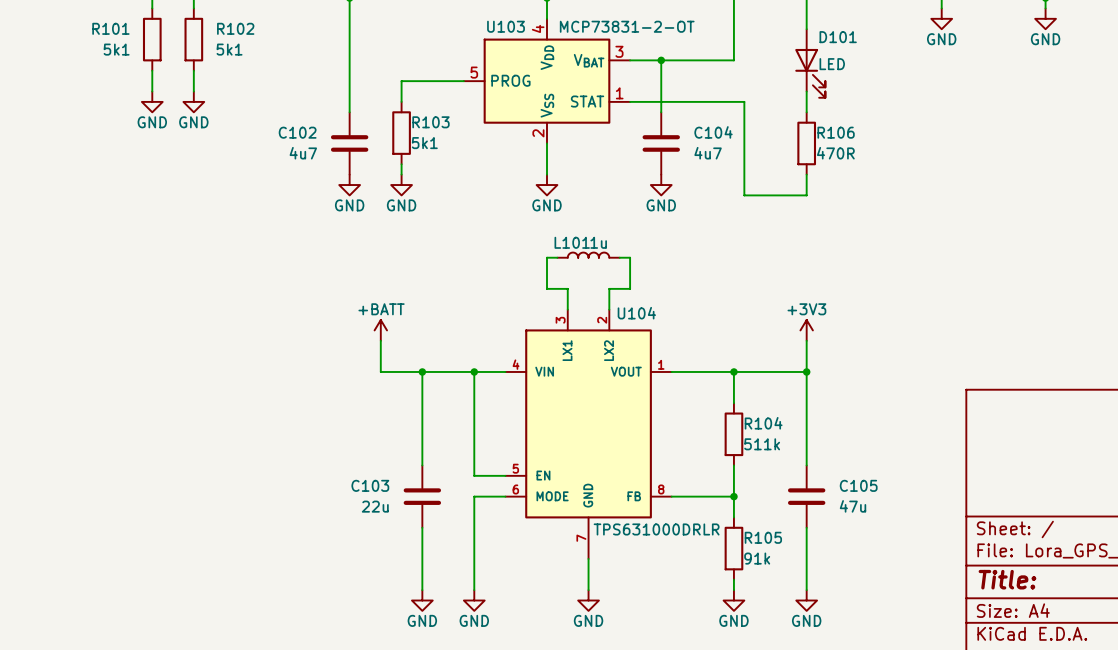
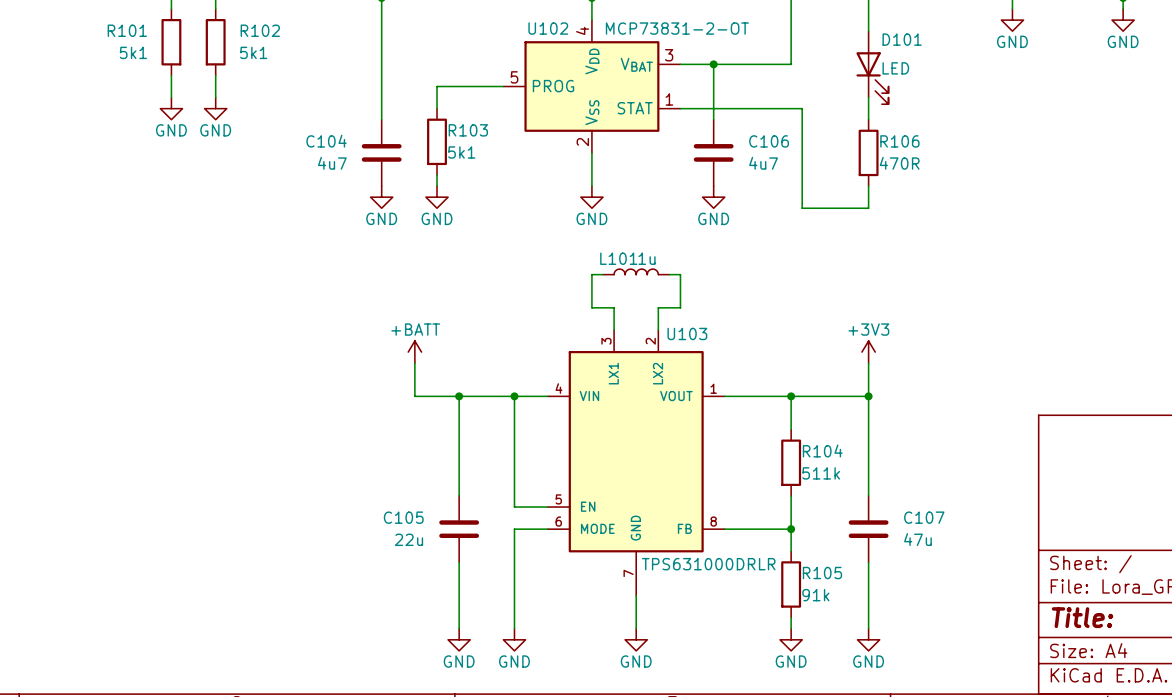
U103 name: U103 (506, 26) -> U102 (548, 28)
C102 name: C102 (297, 132) -> C104 (326, 141)
C104 name: C104 (713, 132) -> C106 (769, 141)
U104 name: U104 (636, 313) -> U103 (687, 333)
C103 name: C103 (370, 485) -> C105 (403, 517)
C105 name: C105 (858, 485) -> C107 (924, 517)

